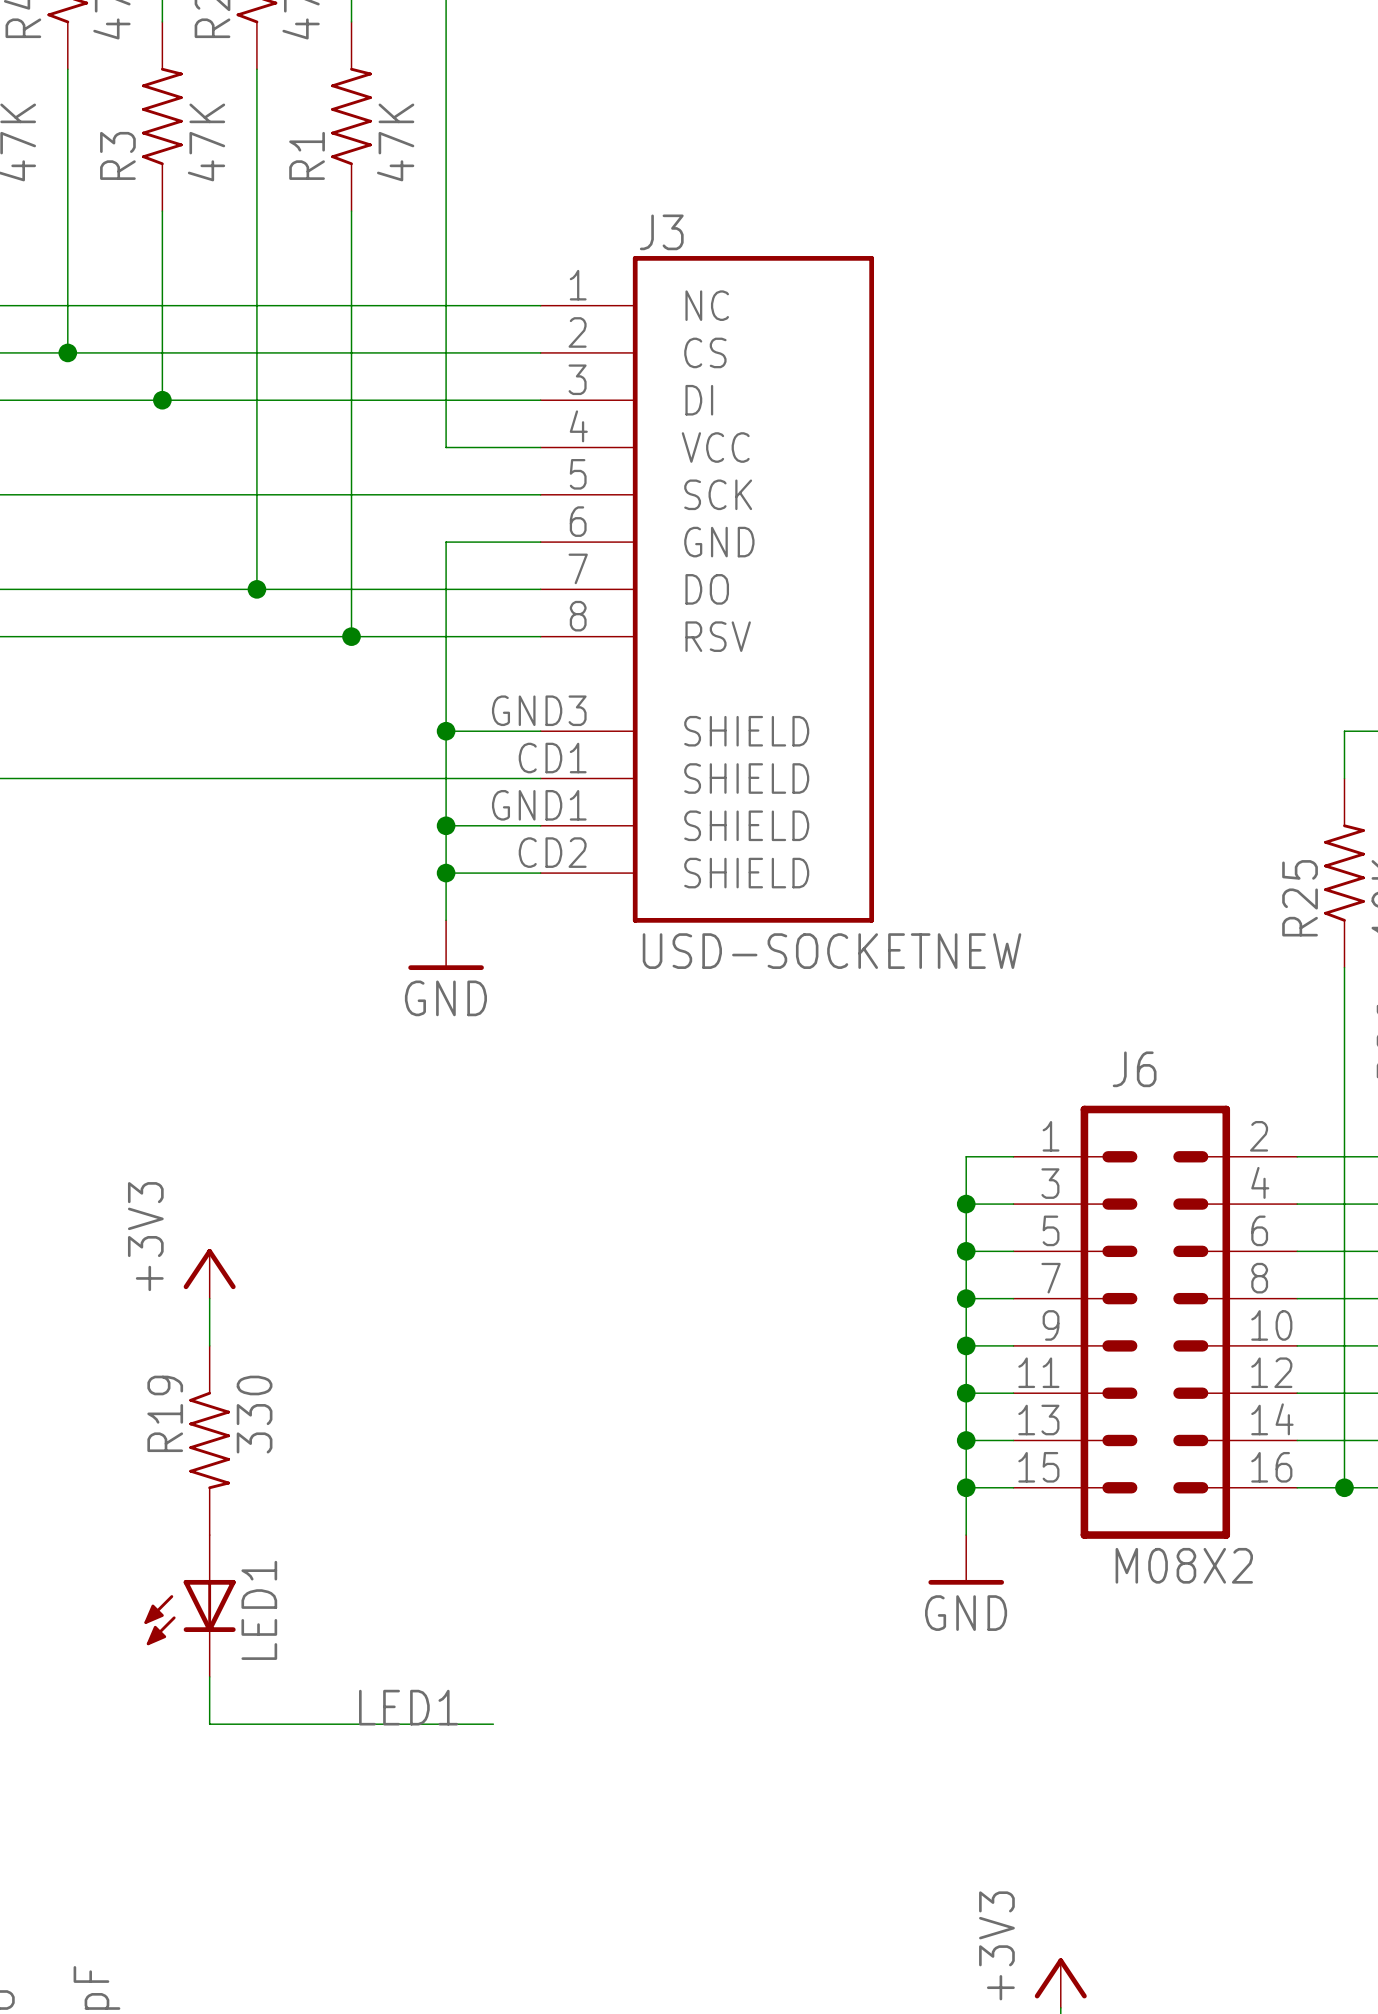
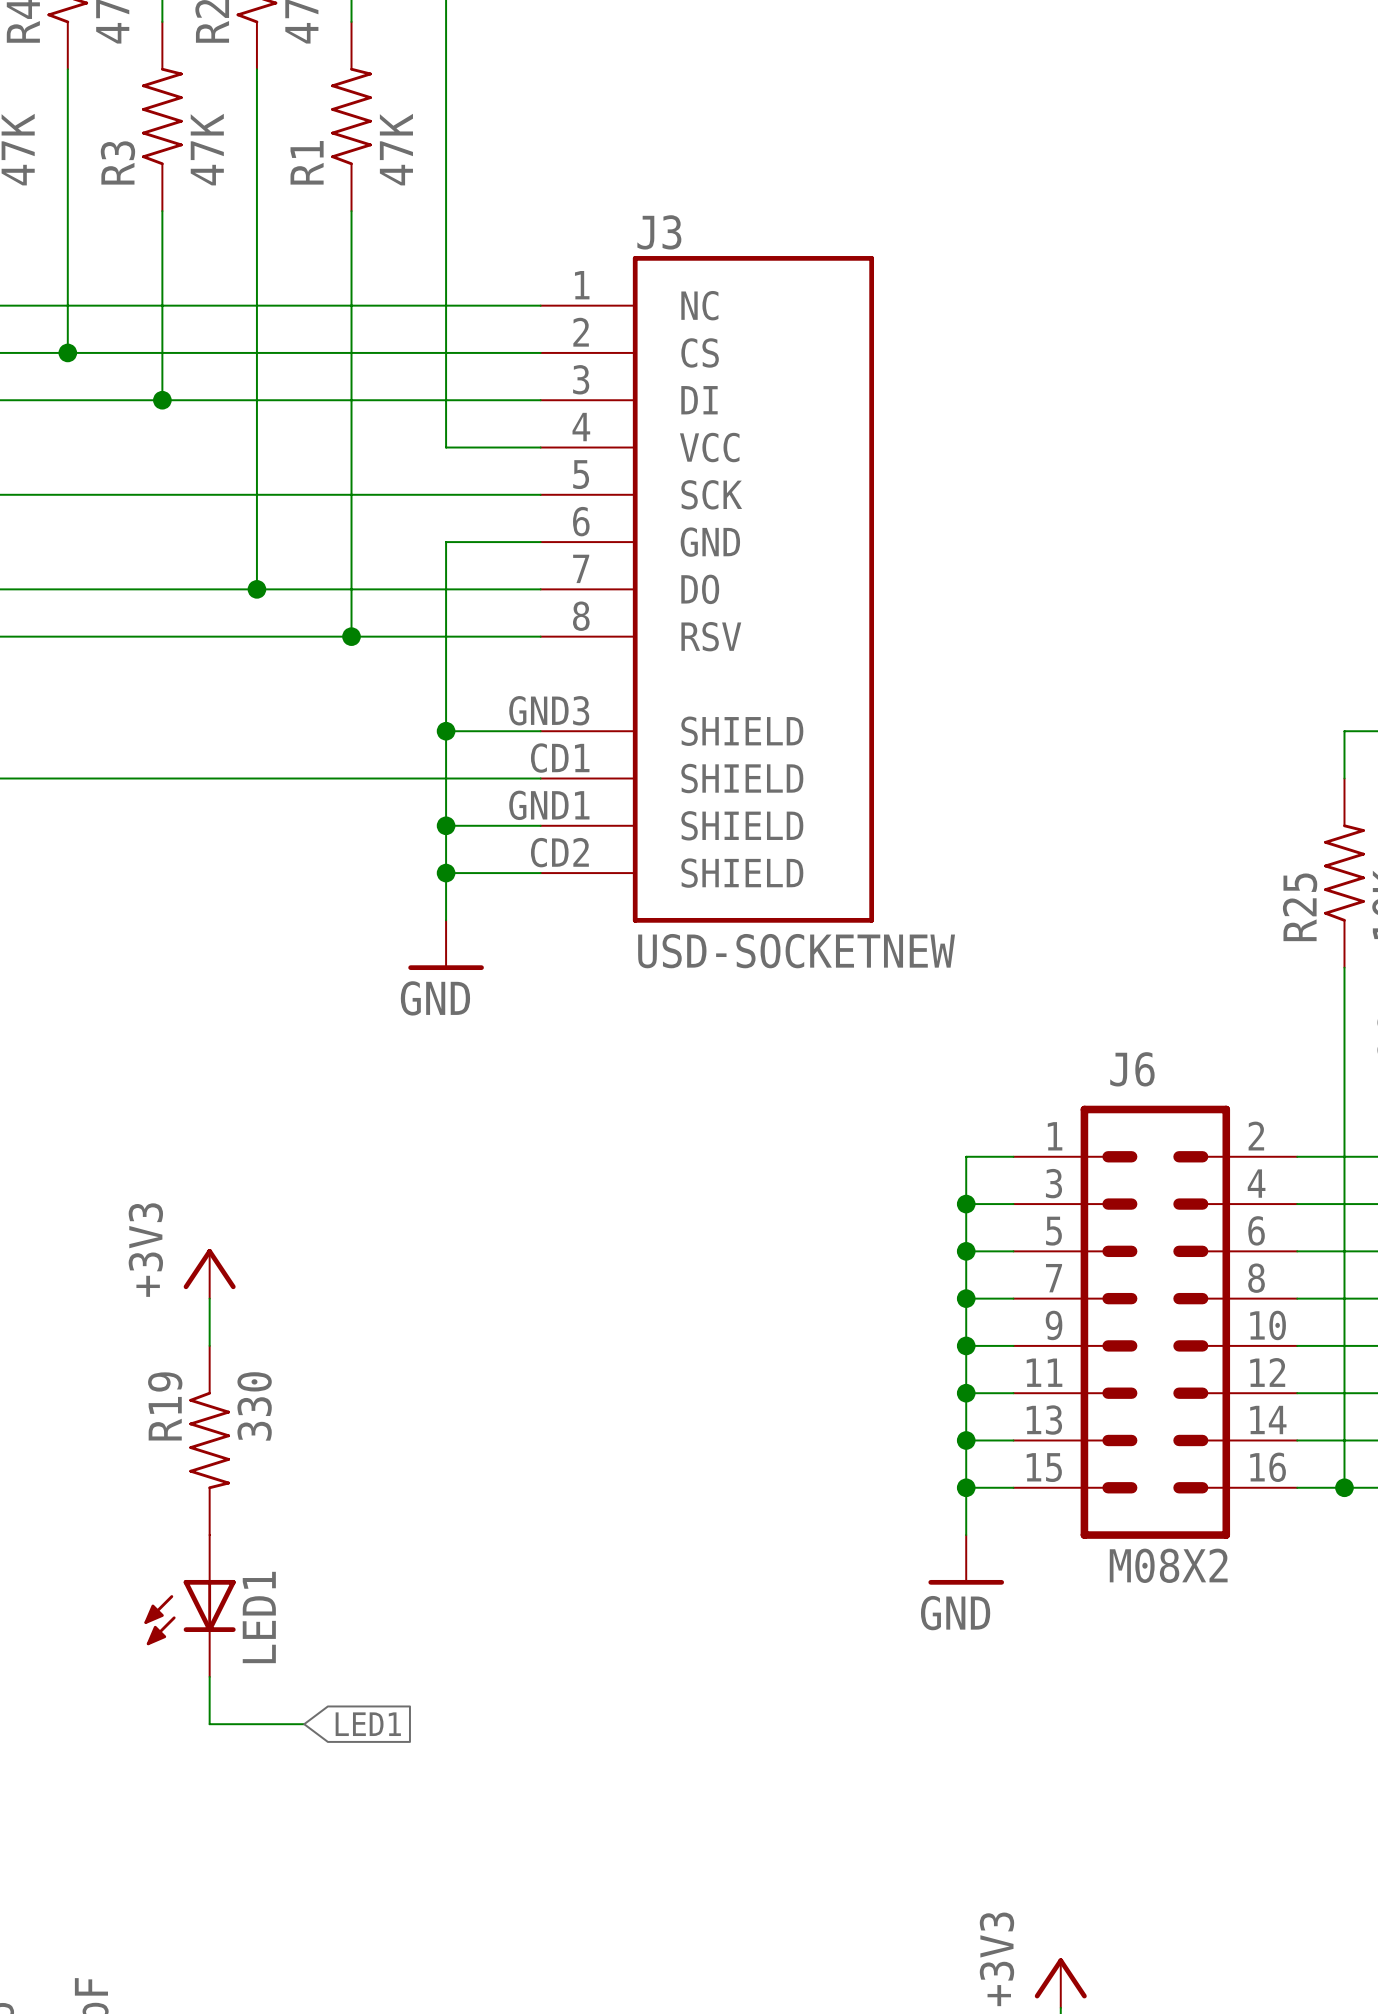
label: LED1 (408, 1707) -> none
wire: (304, 1724) (493, 1724) -> none
global label: none -> LED1 (368, 1724)

